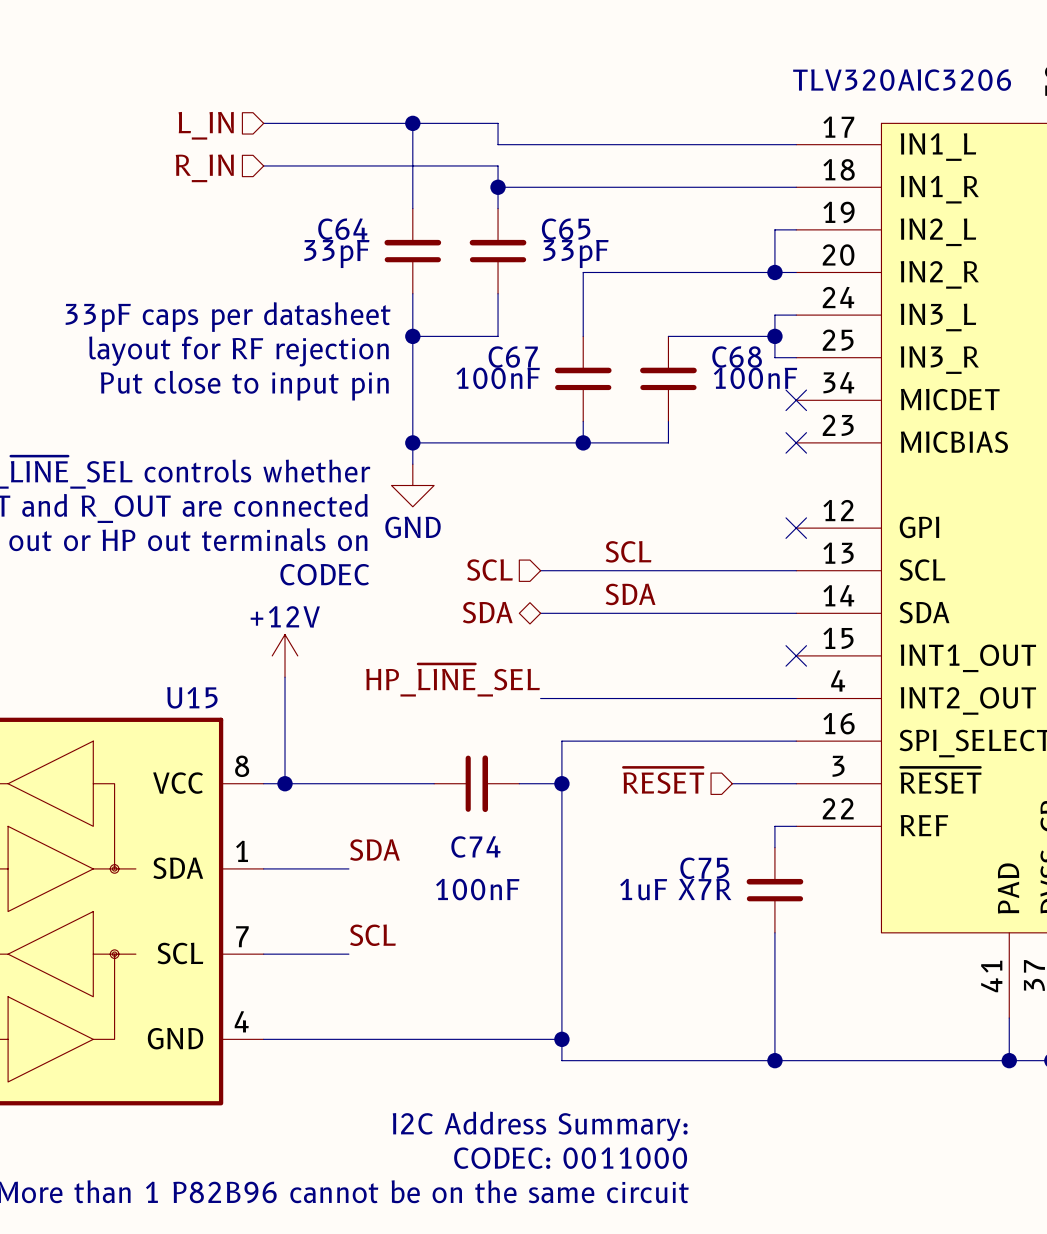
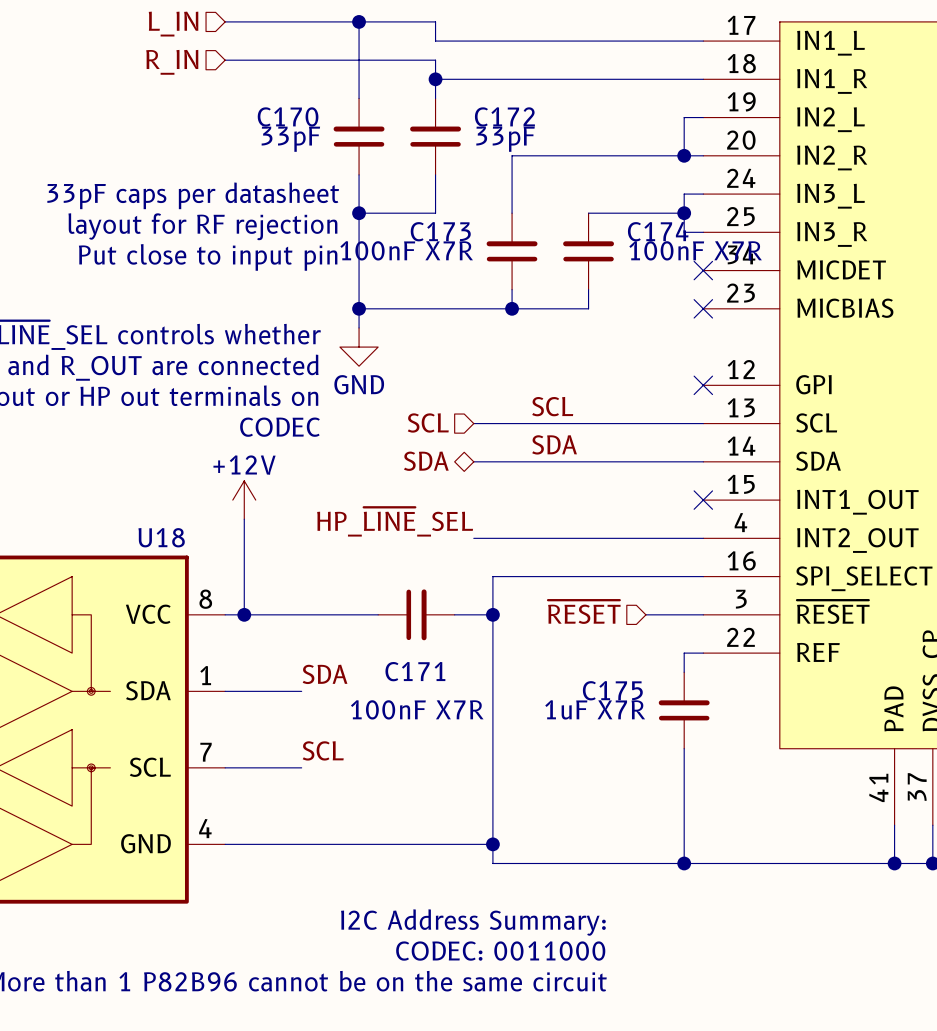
C64 name: C64 (342, 229) -> C170 (288, 116)
C65 name: C65 (566, 229) -> C172 (504, 116)
C67 name: C67 (513, 357) -> C173 (440, 231)
C68 name: C68 (737, 357) -> C174 (658, 231)
C67 value: 100nF (498, 378) -> 100nF X7R (406, 250)
C68 value: 100nF (755, 378) -> 100nF X7R (695, 250)
U15 name: U15 (192, 697) -> U18 (161, 537)
C74 name: C74 (475, 846) -> C171 (415, 671)
C75 name: C75 (704, 868) -> C175 (612, 690)
C74 value: 100nF (477, 889) -> 100nF X7R (417, 709)

